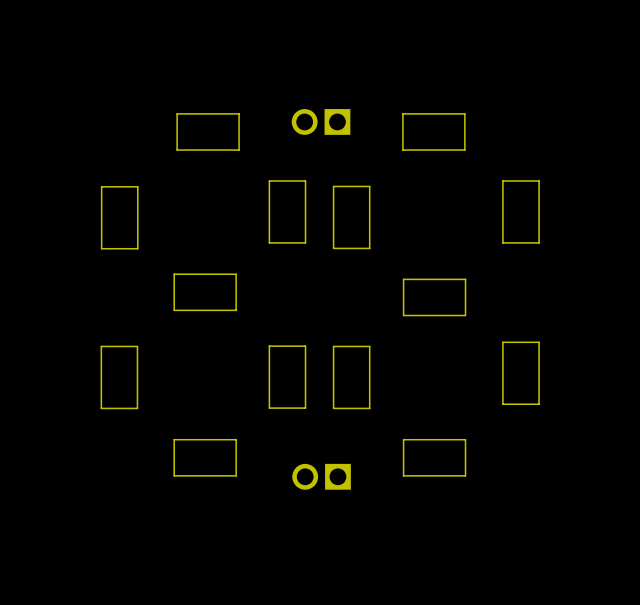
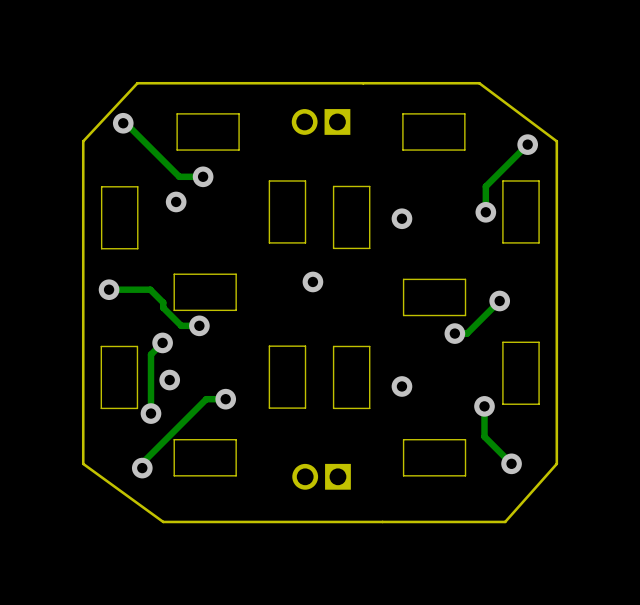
board edge: none -> (479, 83) (556, 141) (556, 463) (505, 521) (163, 521) (83, 463) (83, 141) (137, 83) (479, 83)
track: none -> (123, 123) (124, 121) (179, 176) (203, 176)
via: none -> (123, 123)
track: none -> (527, 144) (485, 186) (485, 212)
via: none -> (527, 144)
via: none -> (203, 176)
via: none -> (176, 201)
via: none -> (485, 212)
via: none -> (401, 218)
via: none -> (312, 281)
track: none -> (109, 289) (150, 289) (163, 302) (163, 307) (181, 325) (199, 325)
via: none -> (109, 289)
track: none -> (499, 300) (467, 333) (454, 333)
via: none -> (499, 300)
via: none -> (199, 325)
via: none -> (454, 333)
track: none -> (162, 342) (151, 354) (151, 413)
via: none -> (162, 342)
via: none -> (169, 380)
via: none -> (401, 386)
track: none -> (225, 399) (206, 399) (142, 463) (142, 468)
via: none -> (225, 399)
track: none -> (484, 406) (484, 436) (511, 463)
via: none -> (484, 406)
via: none -> (151, 413)
via: none -> (511, 463)
via: none -> (142, 468)

